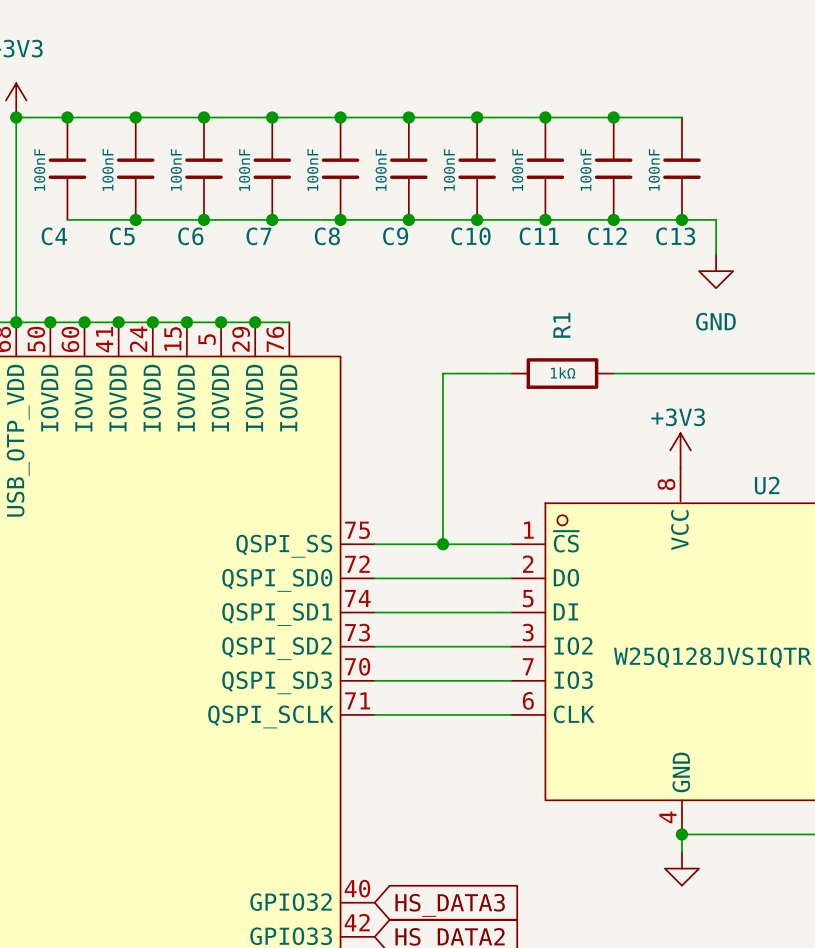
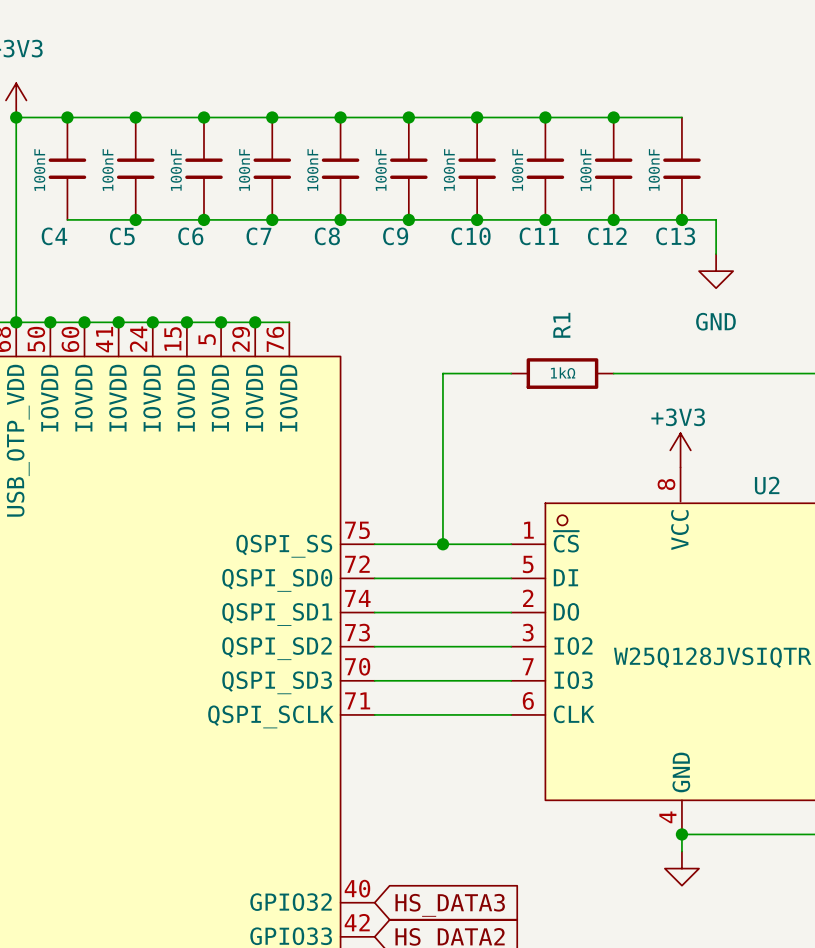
U2 pin number: 2 (528, 564) -> 5 (528, 564)
U2 pin name: DO (566, 577) -> DI (565, 577)
U2 pin number: 5 (528, 598) -> 2 (528, 598)
U2 pin name: DI (565, 611) -> DO (566, 611)

